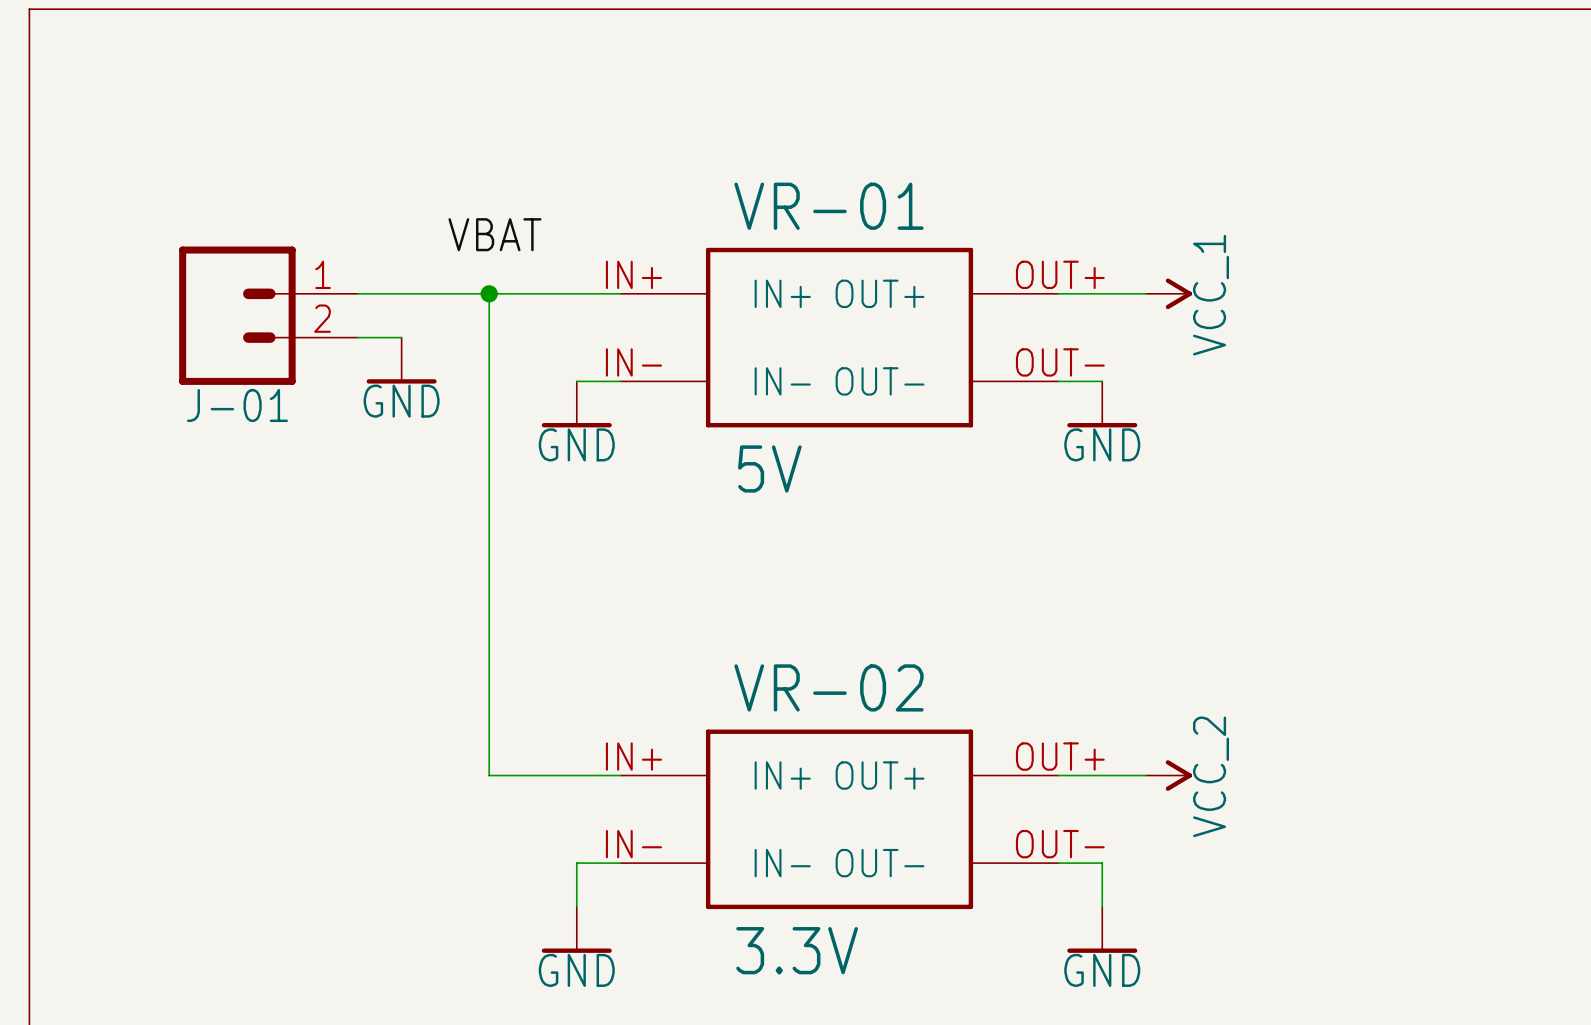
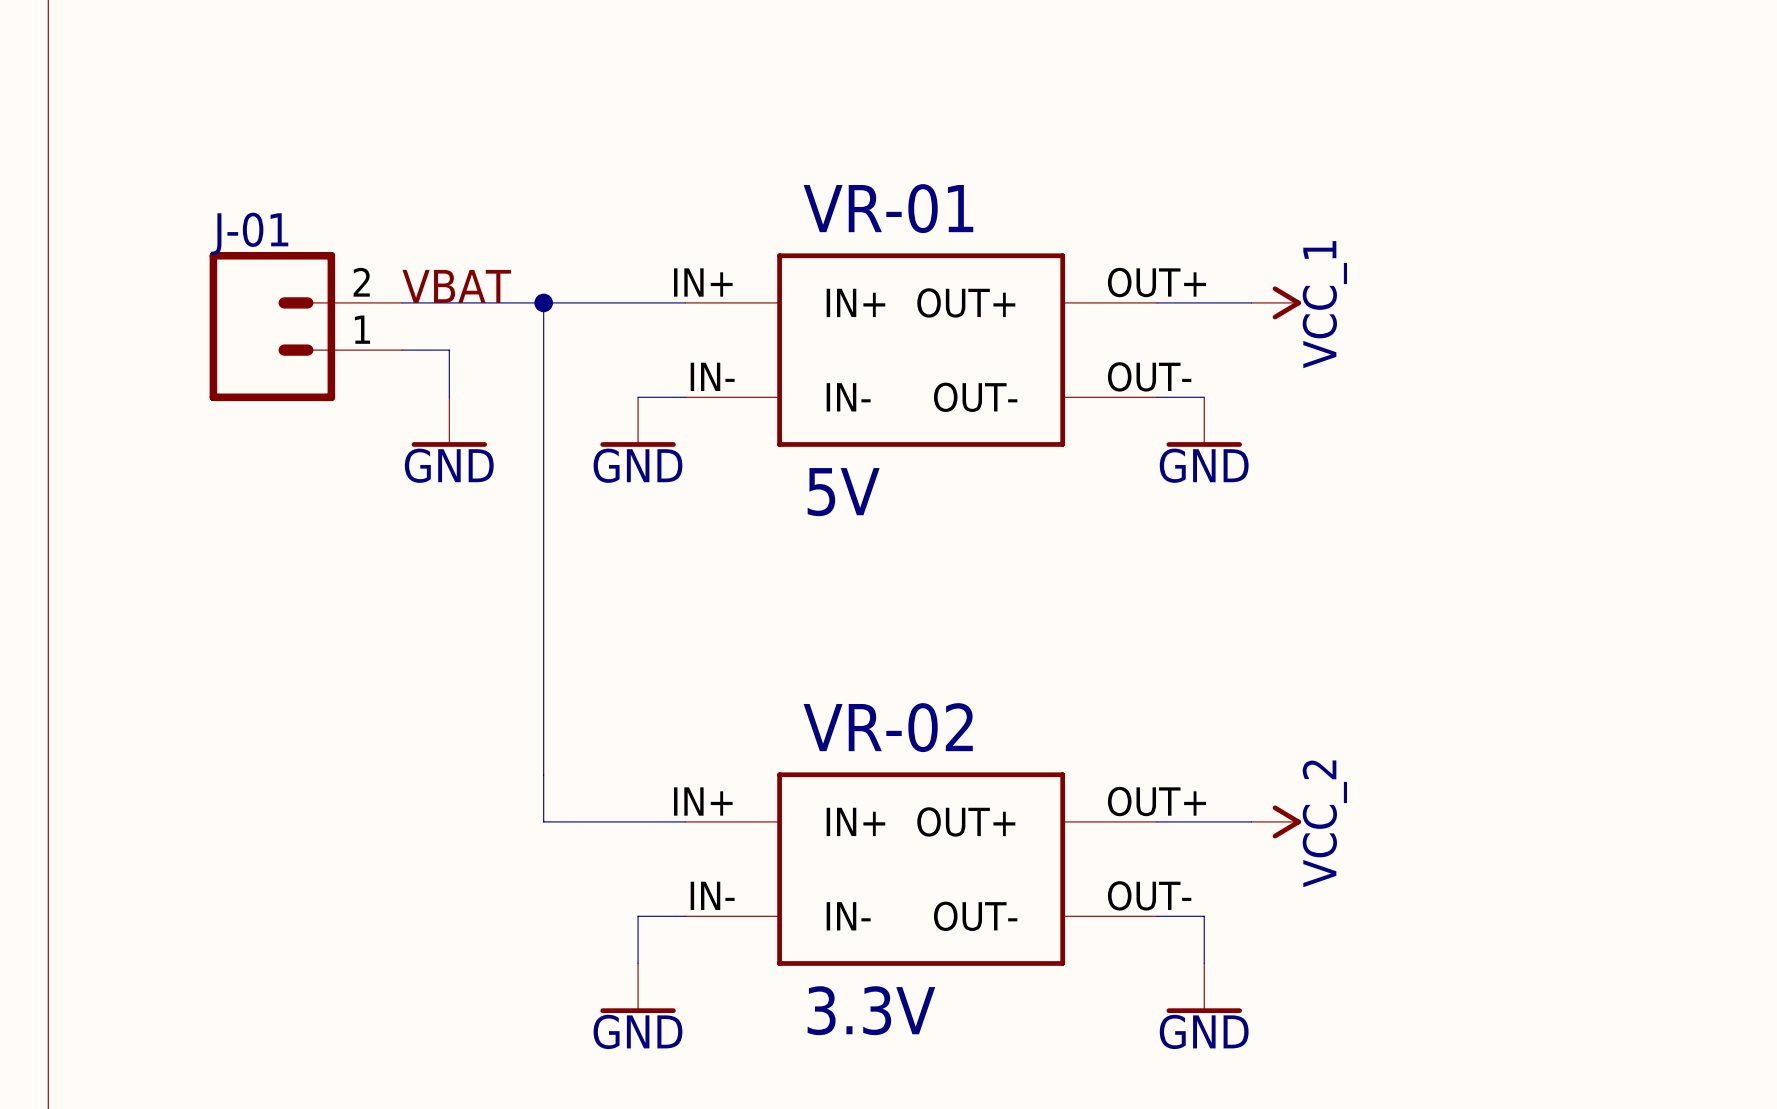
label position: VBAT (494, 234) -> VBAT (456, 286)
J-01 flip: as is (237, 315) -> up-down (272, 326)
power symbol position: GND (401, 360) -> GND (449, 422)

